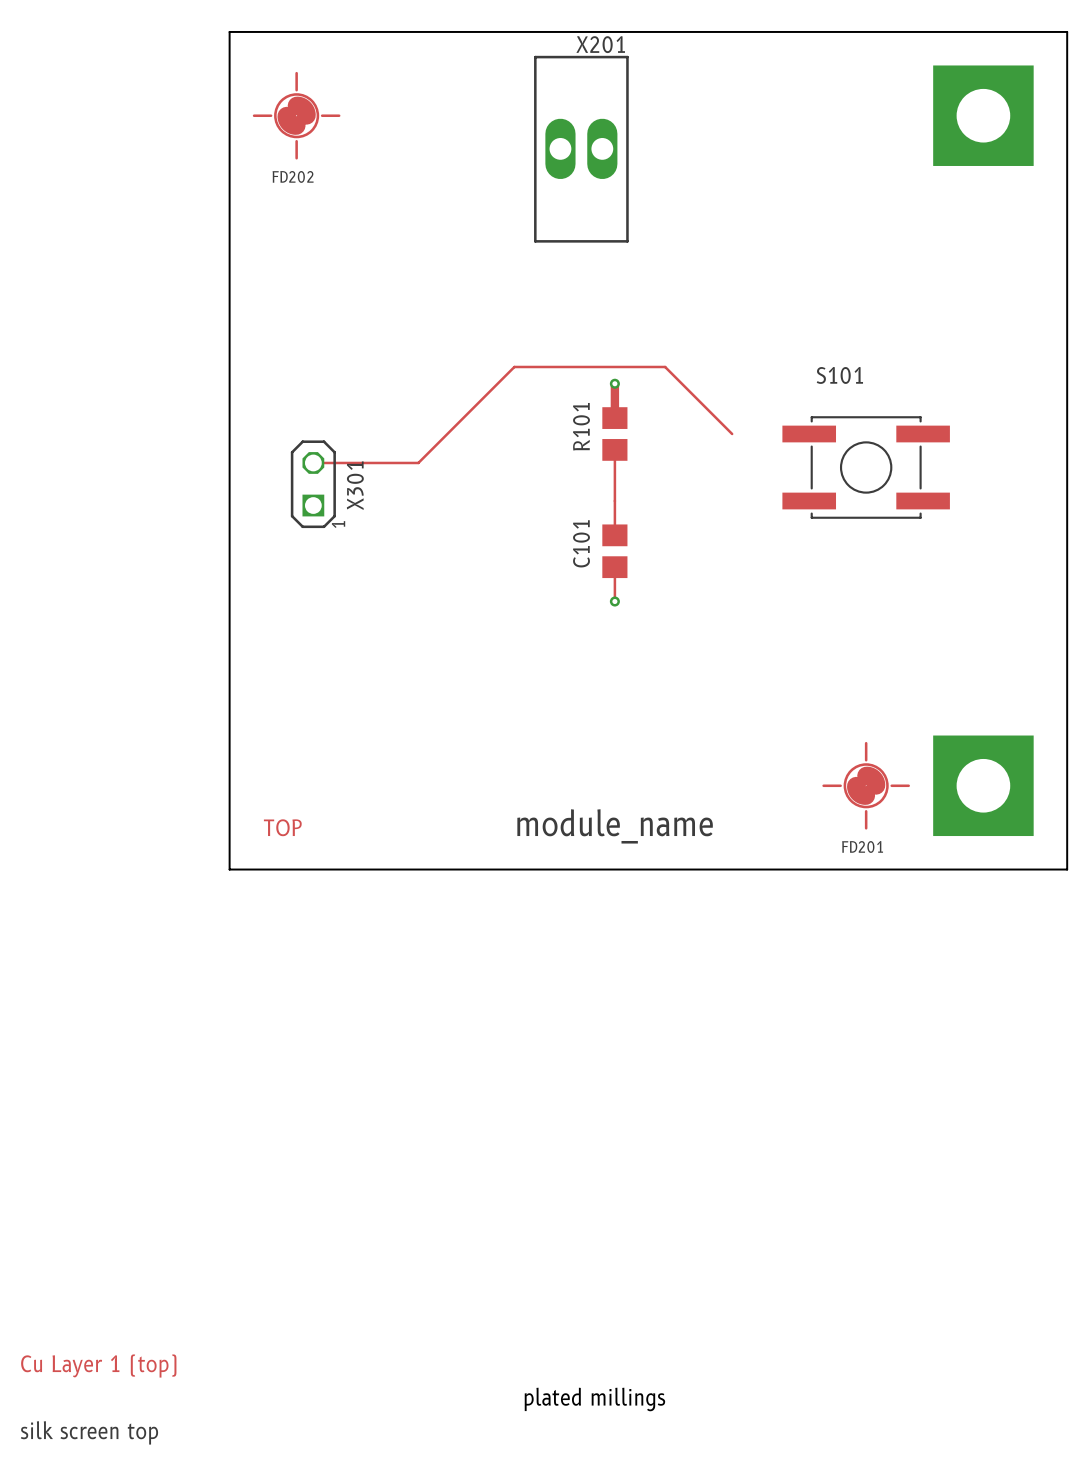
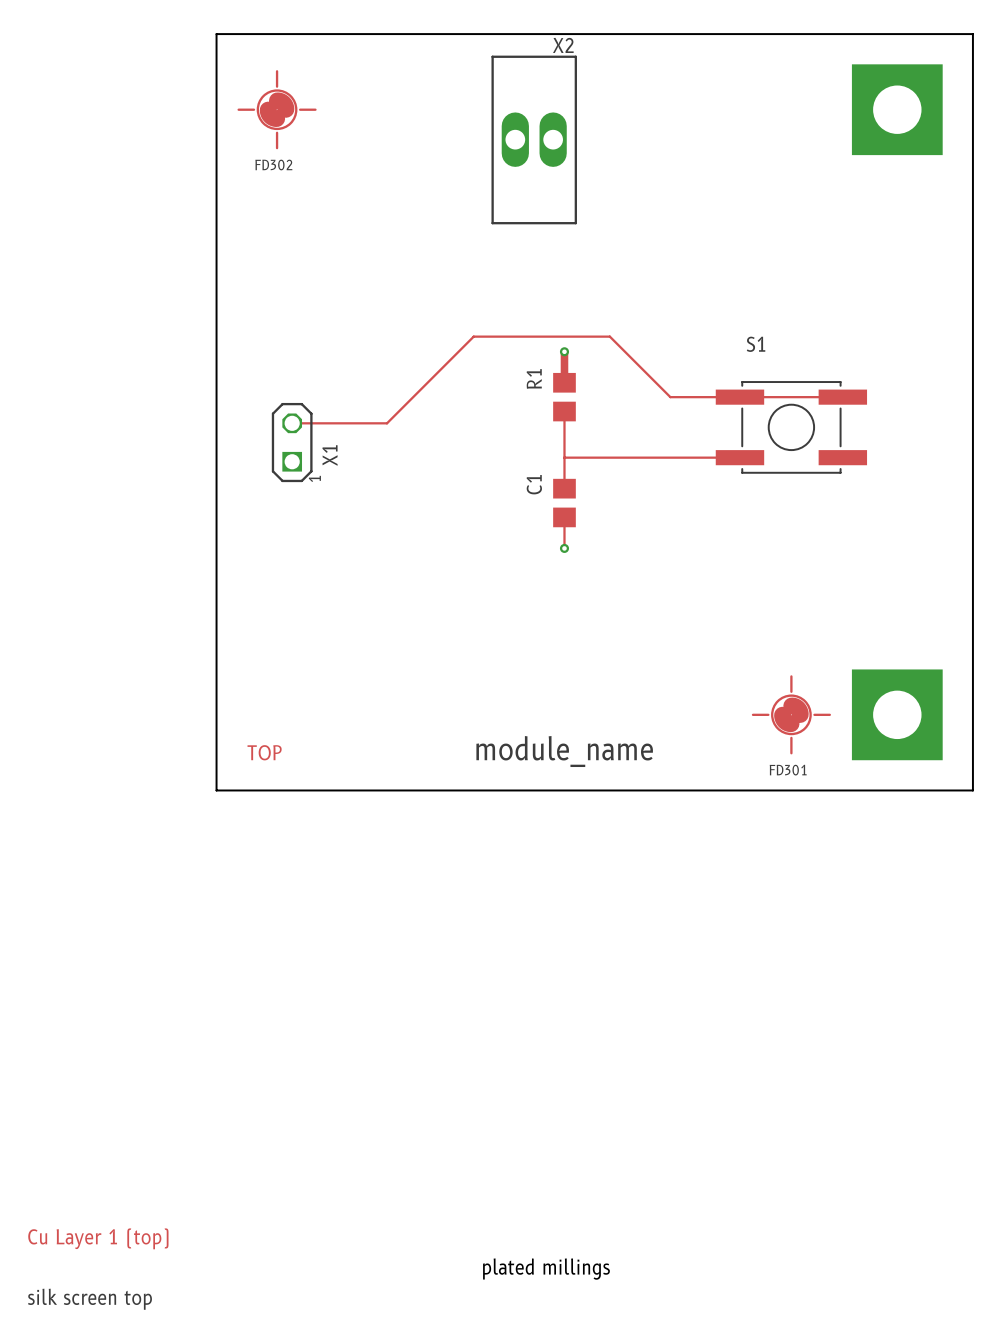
X201 name: X201 (600, 44) -> X2 (563, 45)
FD202 name: FD202 (293, 176) -> FD302 (273, 165)
S101 name: S101 (839, 375) -> S1 (756, 344)
R101 name: R101 (581, 426) -> R1 (534, 378)
track: none -> (670, 397) (842, 397)
X301 name: X301 (355, 485) -> X1 (330, 455)
track: none -> (564, 457) (739, 457)
C101 name: C101 (581, 543) -> C1 (534, 484)
FD201 name: FD201 (862, 846) -> FD301 (788, 770)

